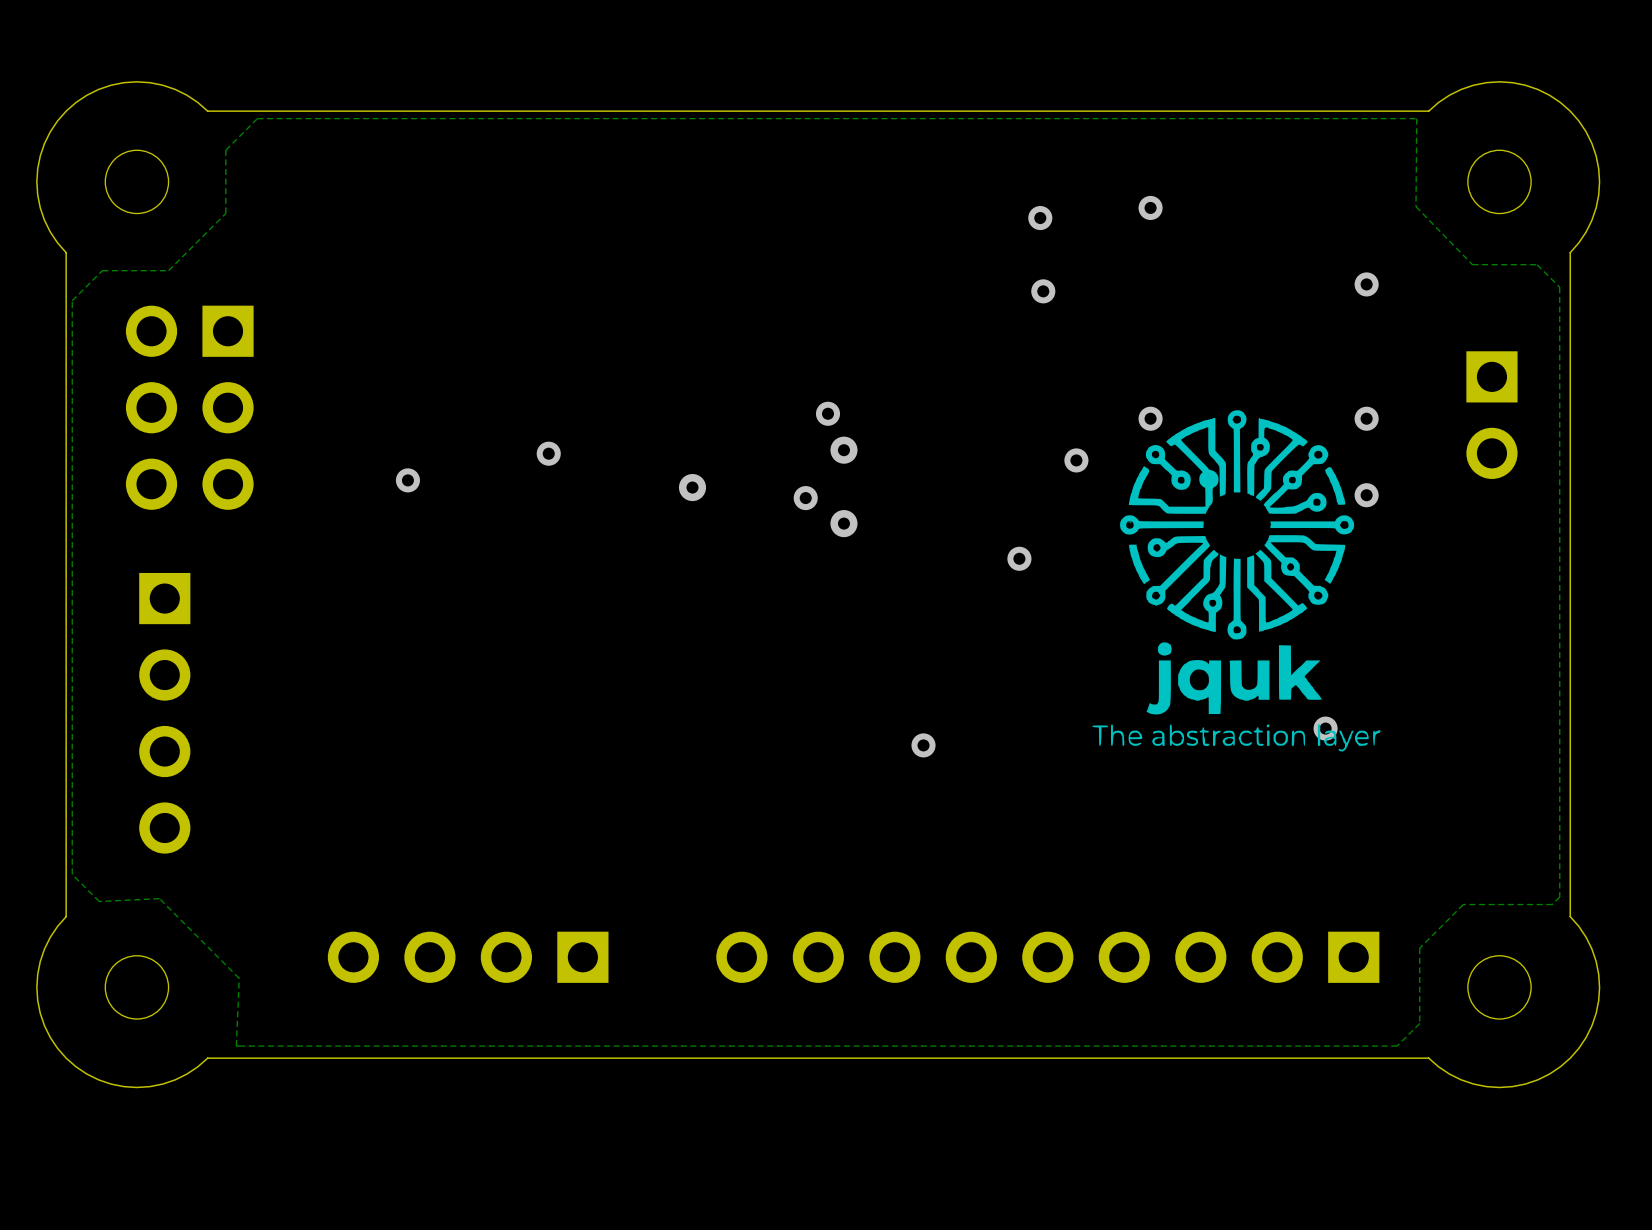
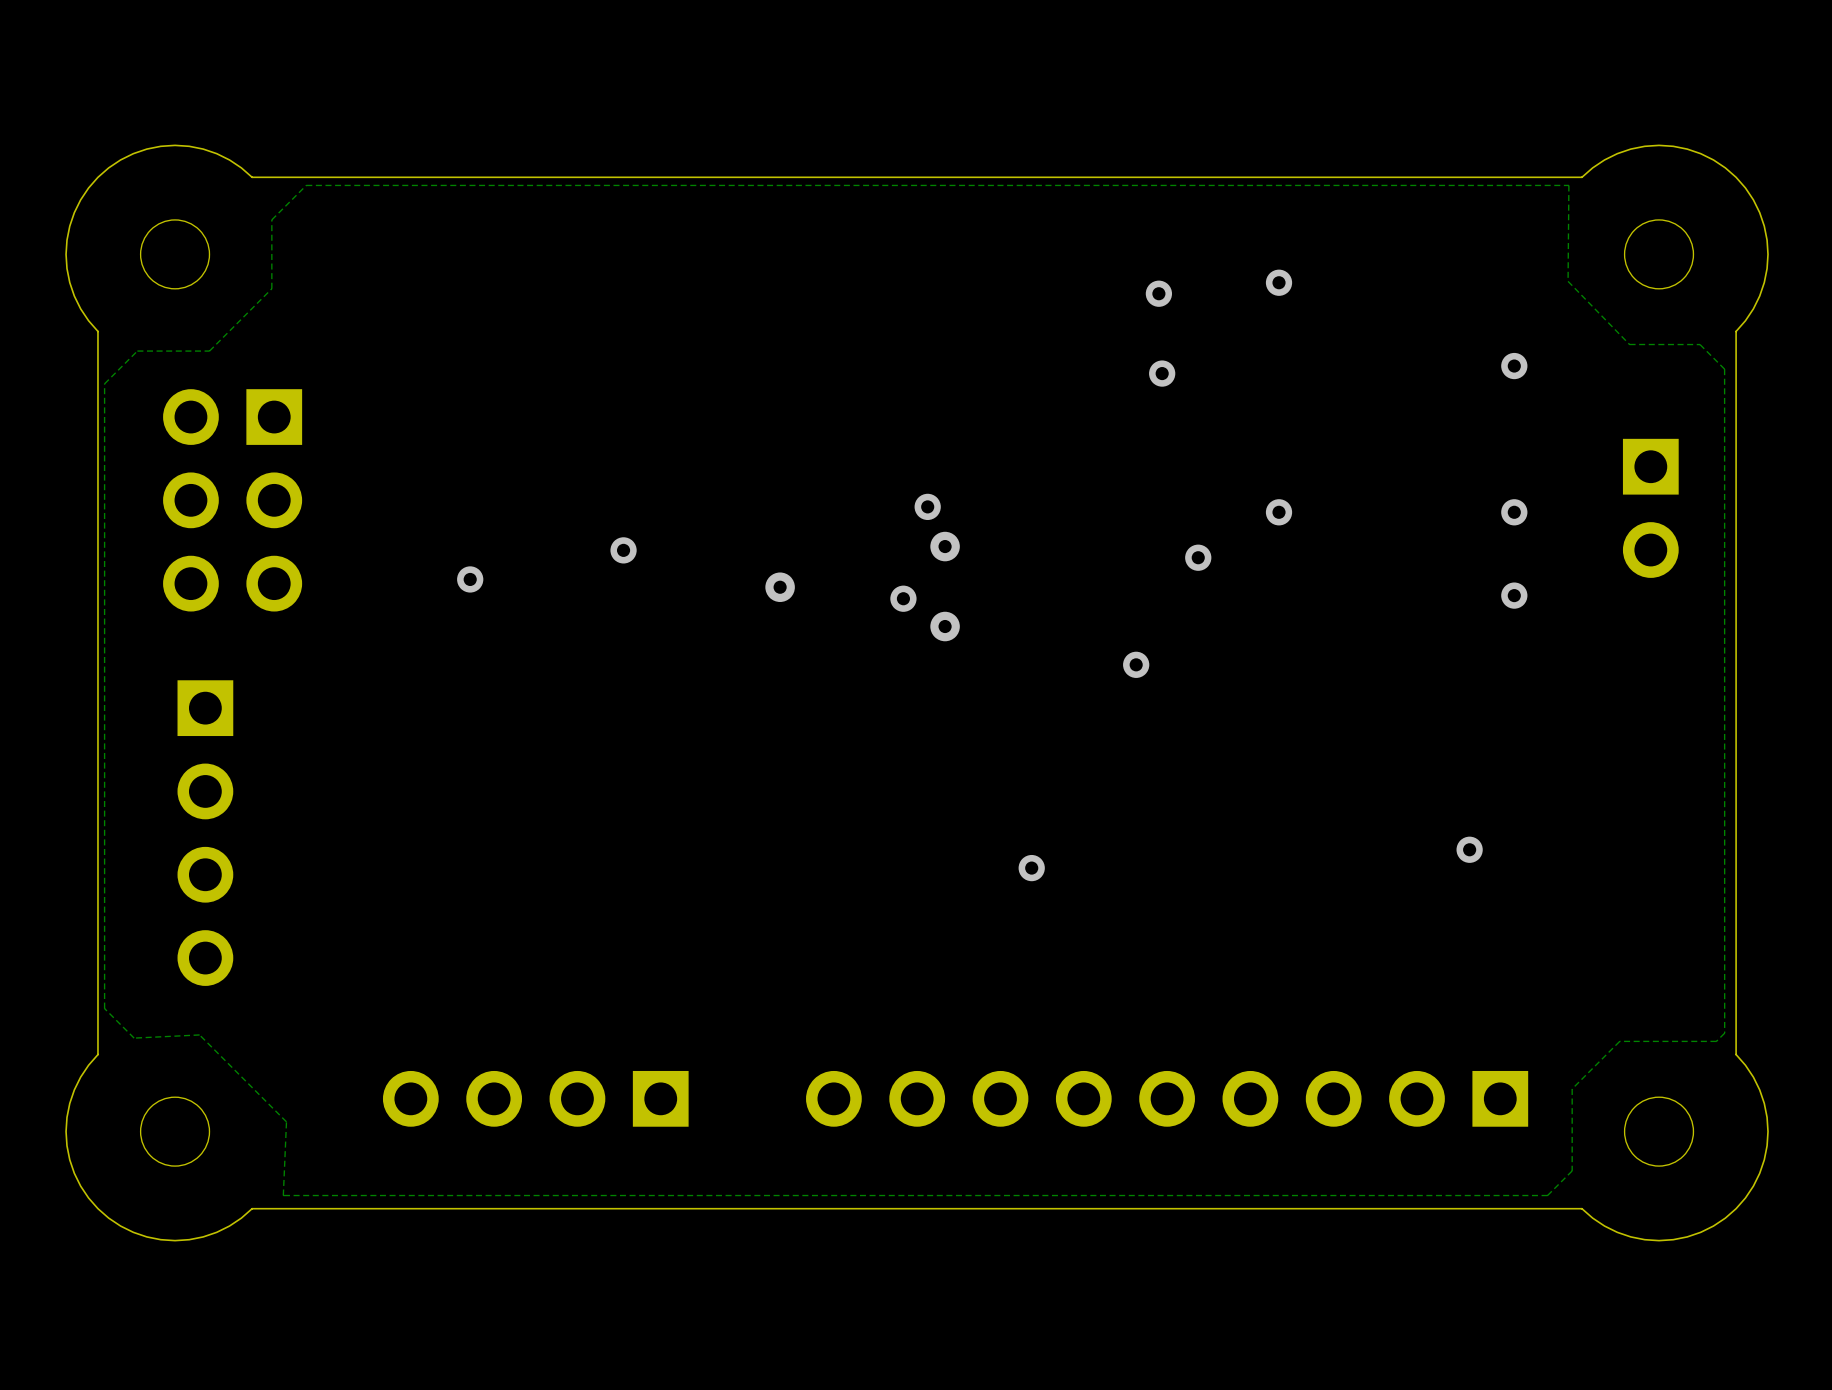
drawing: [1092, 410, 1381, 752] -> none

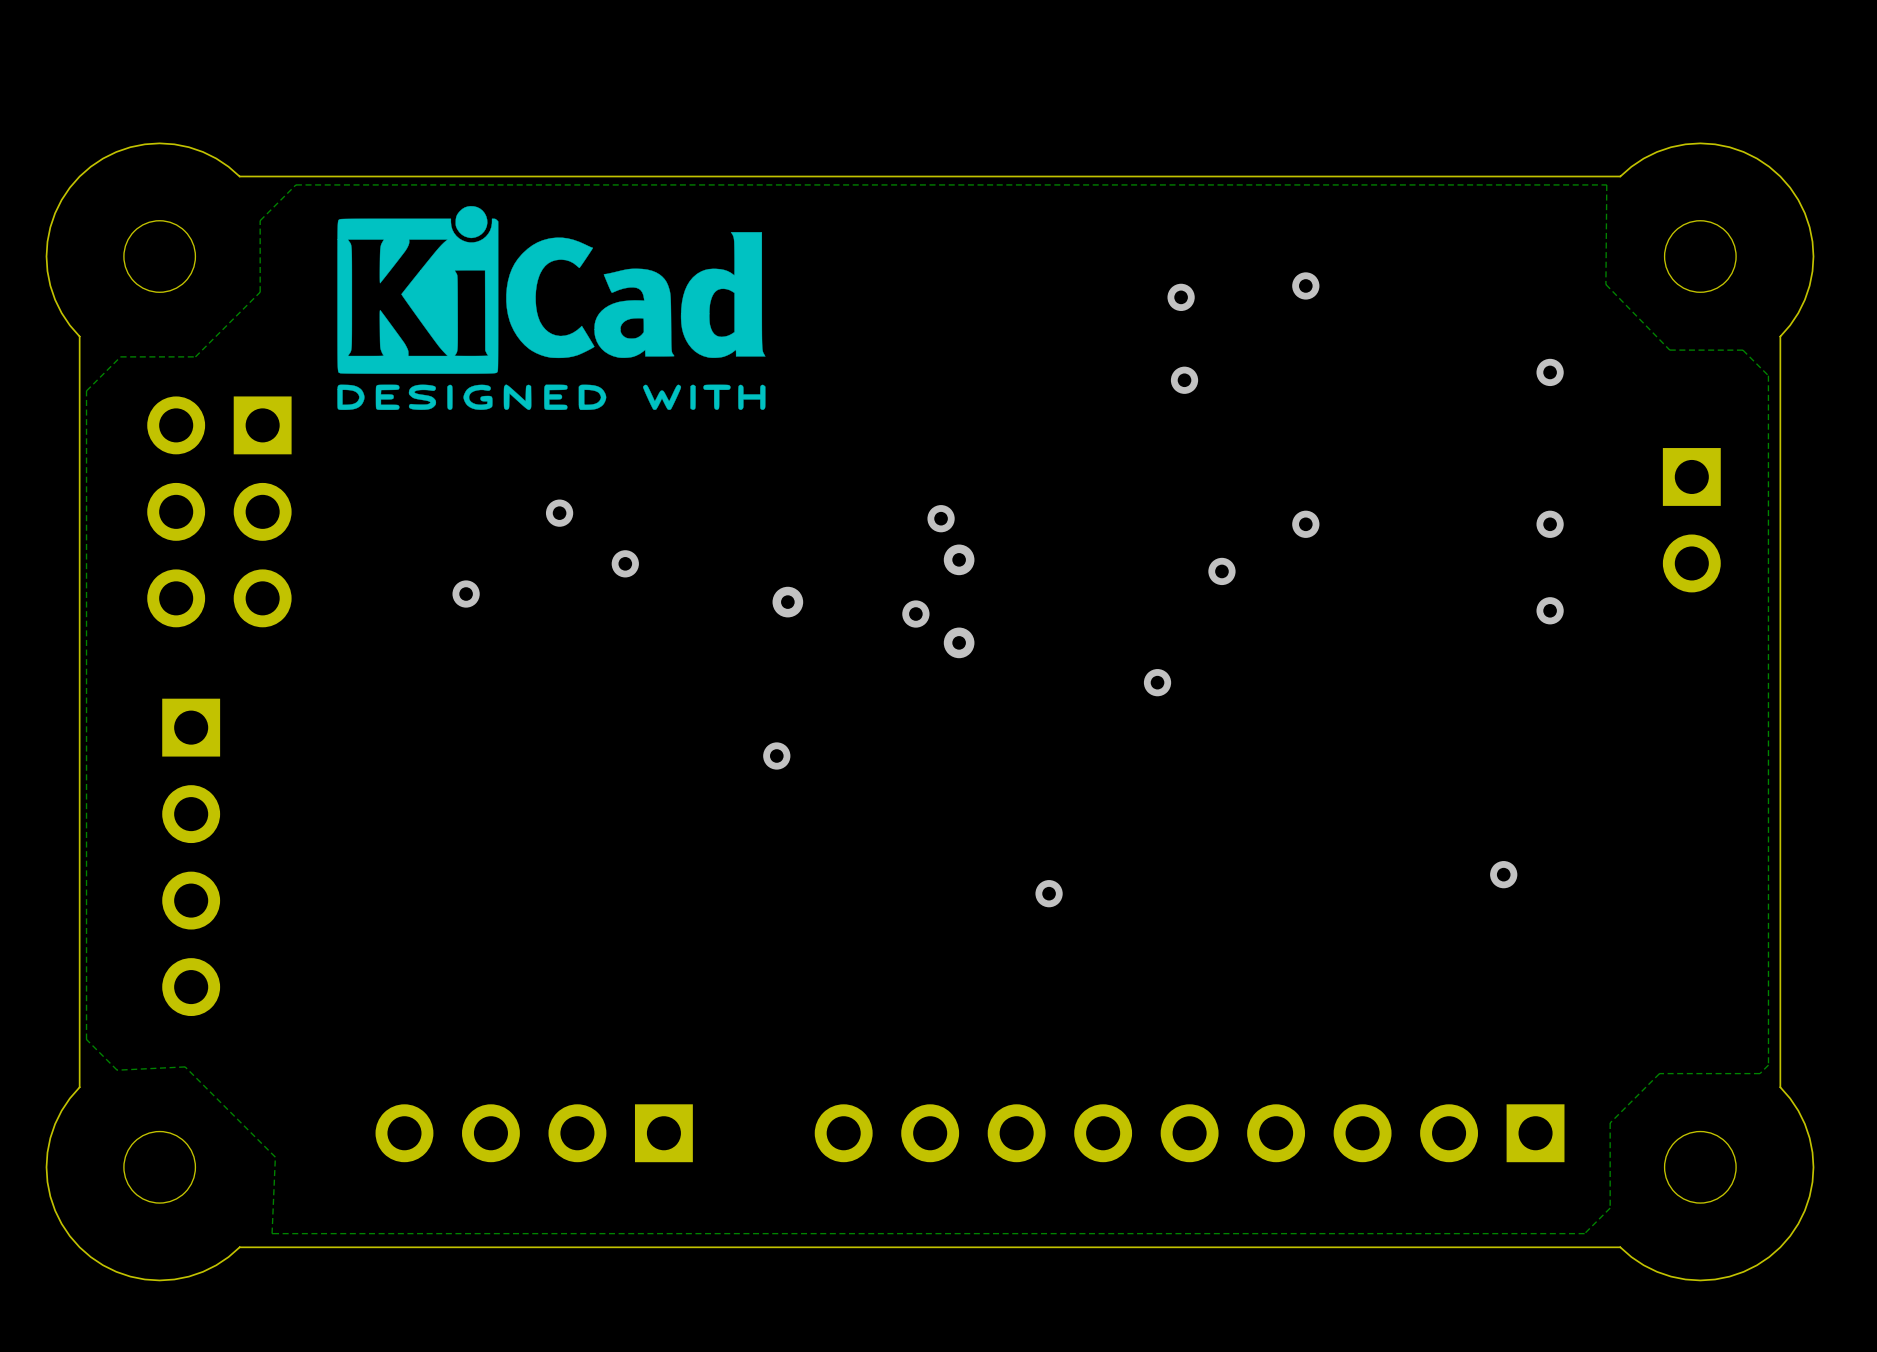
drawing: none -> [337, 206, 766, 410]
via: none -> (559, 513)
via: none -> (776, 755)

